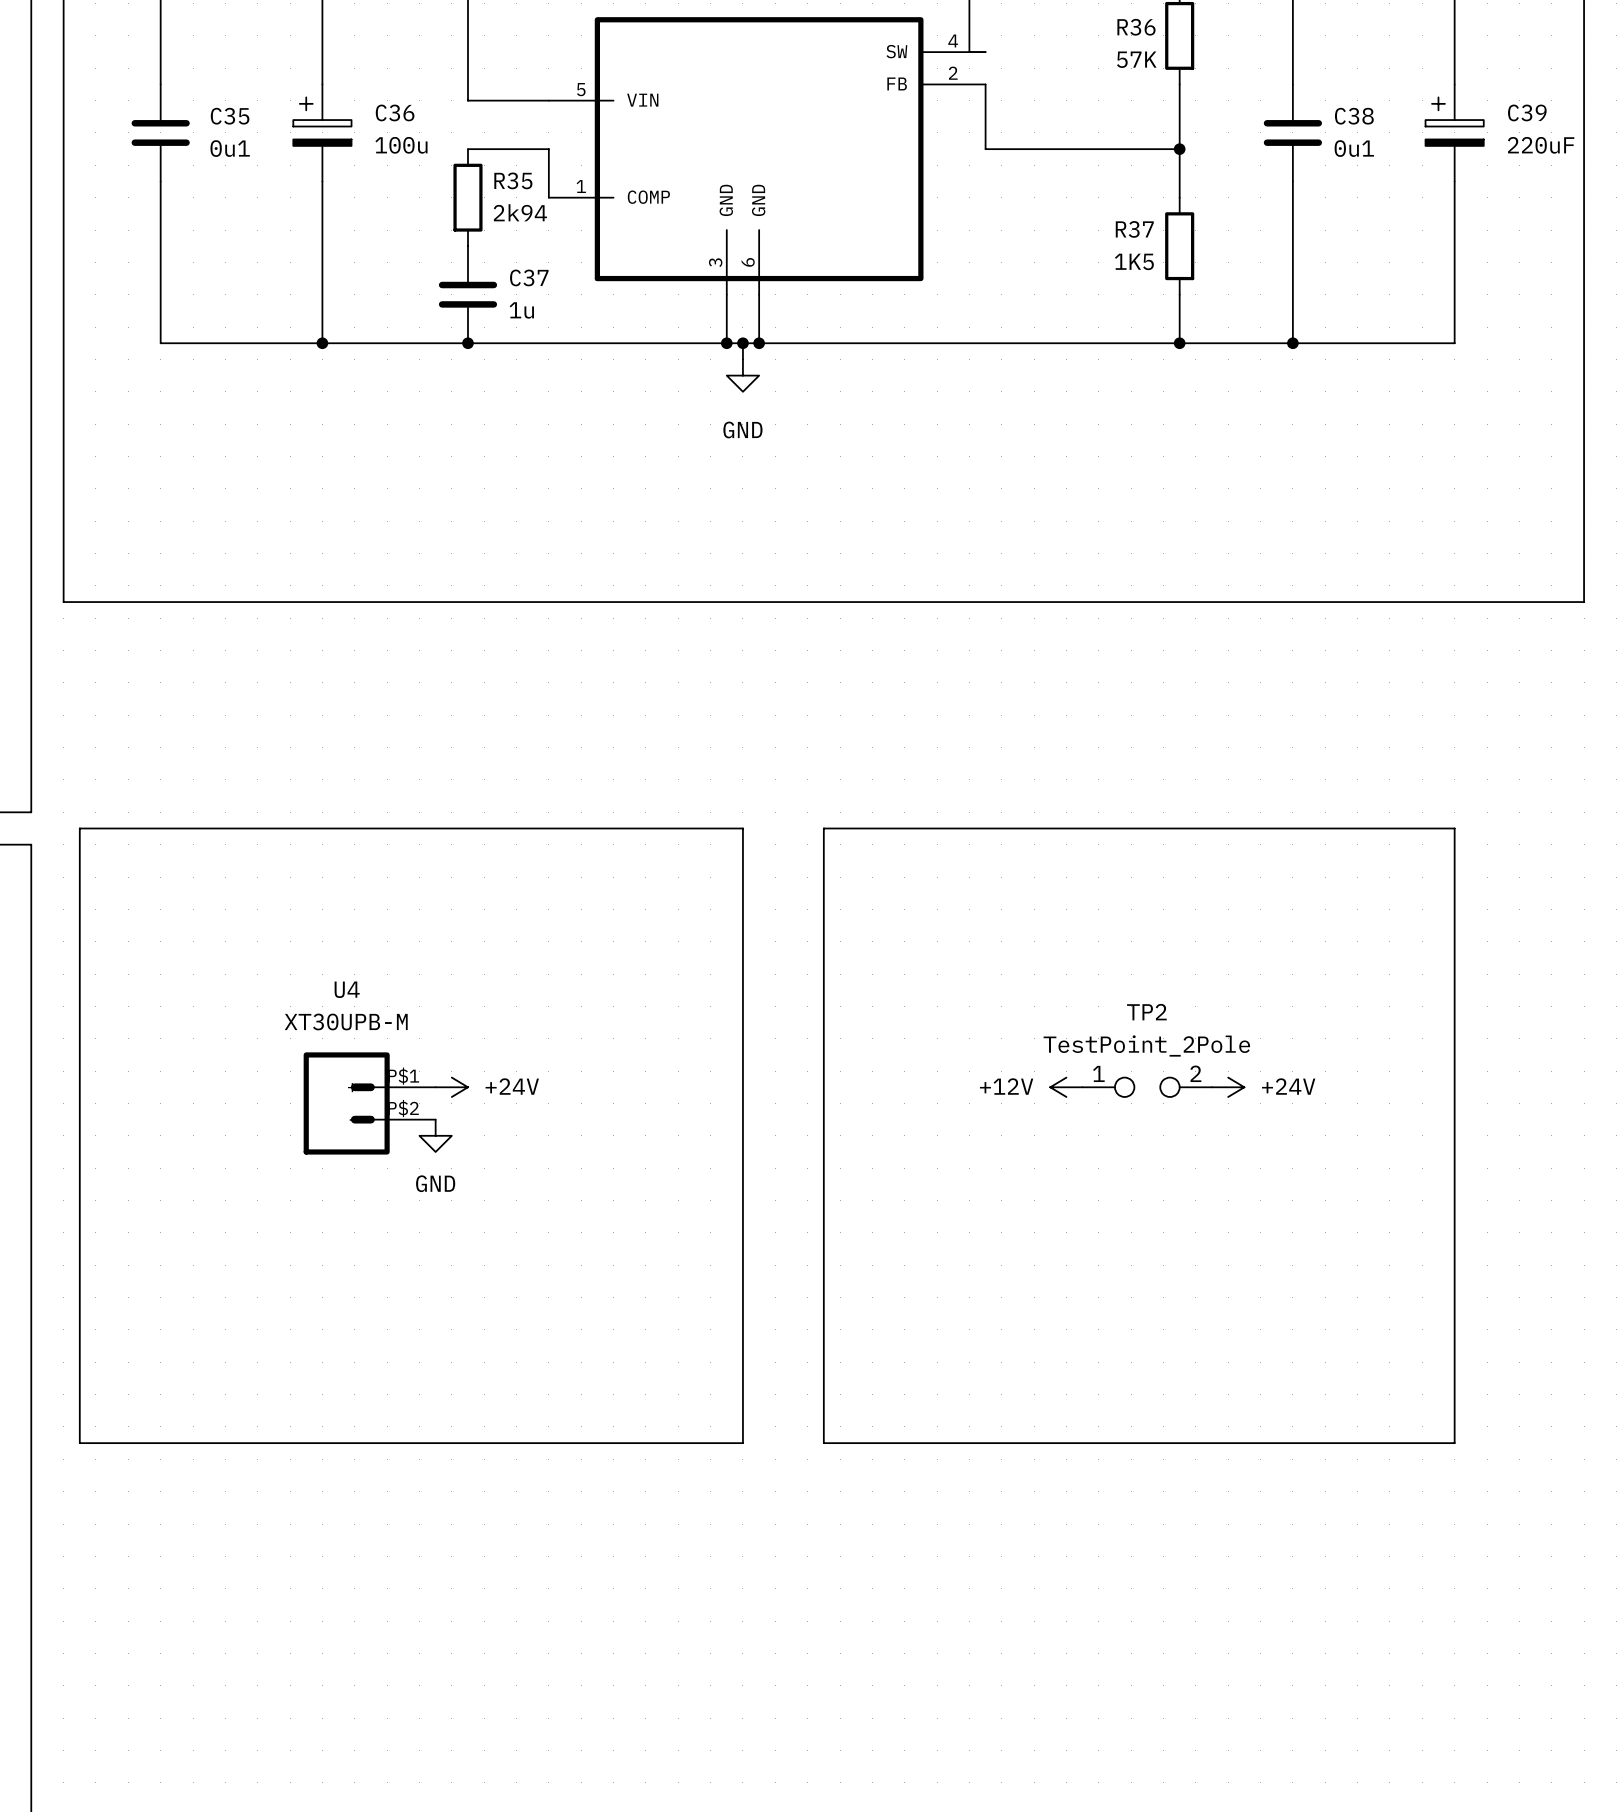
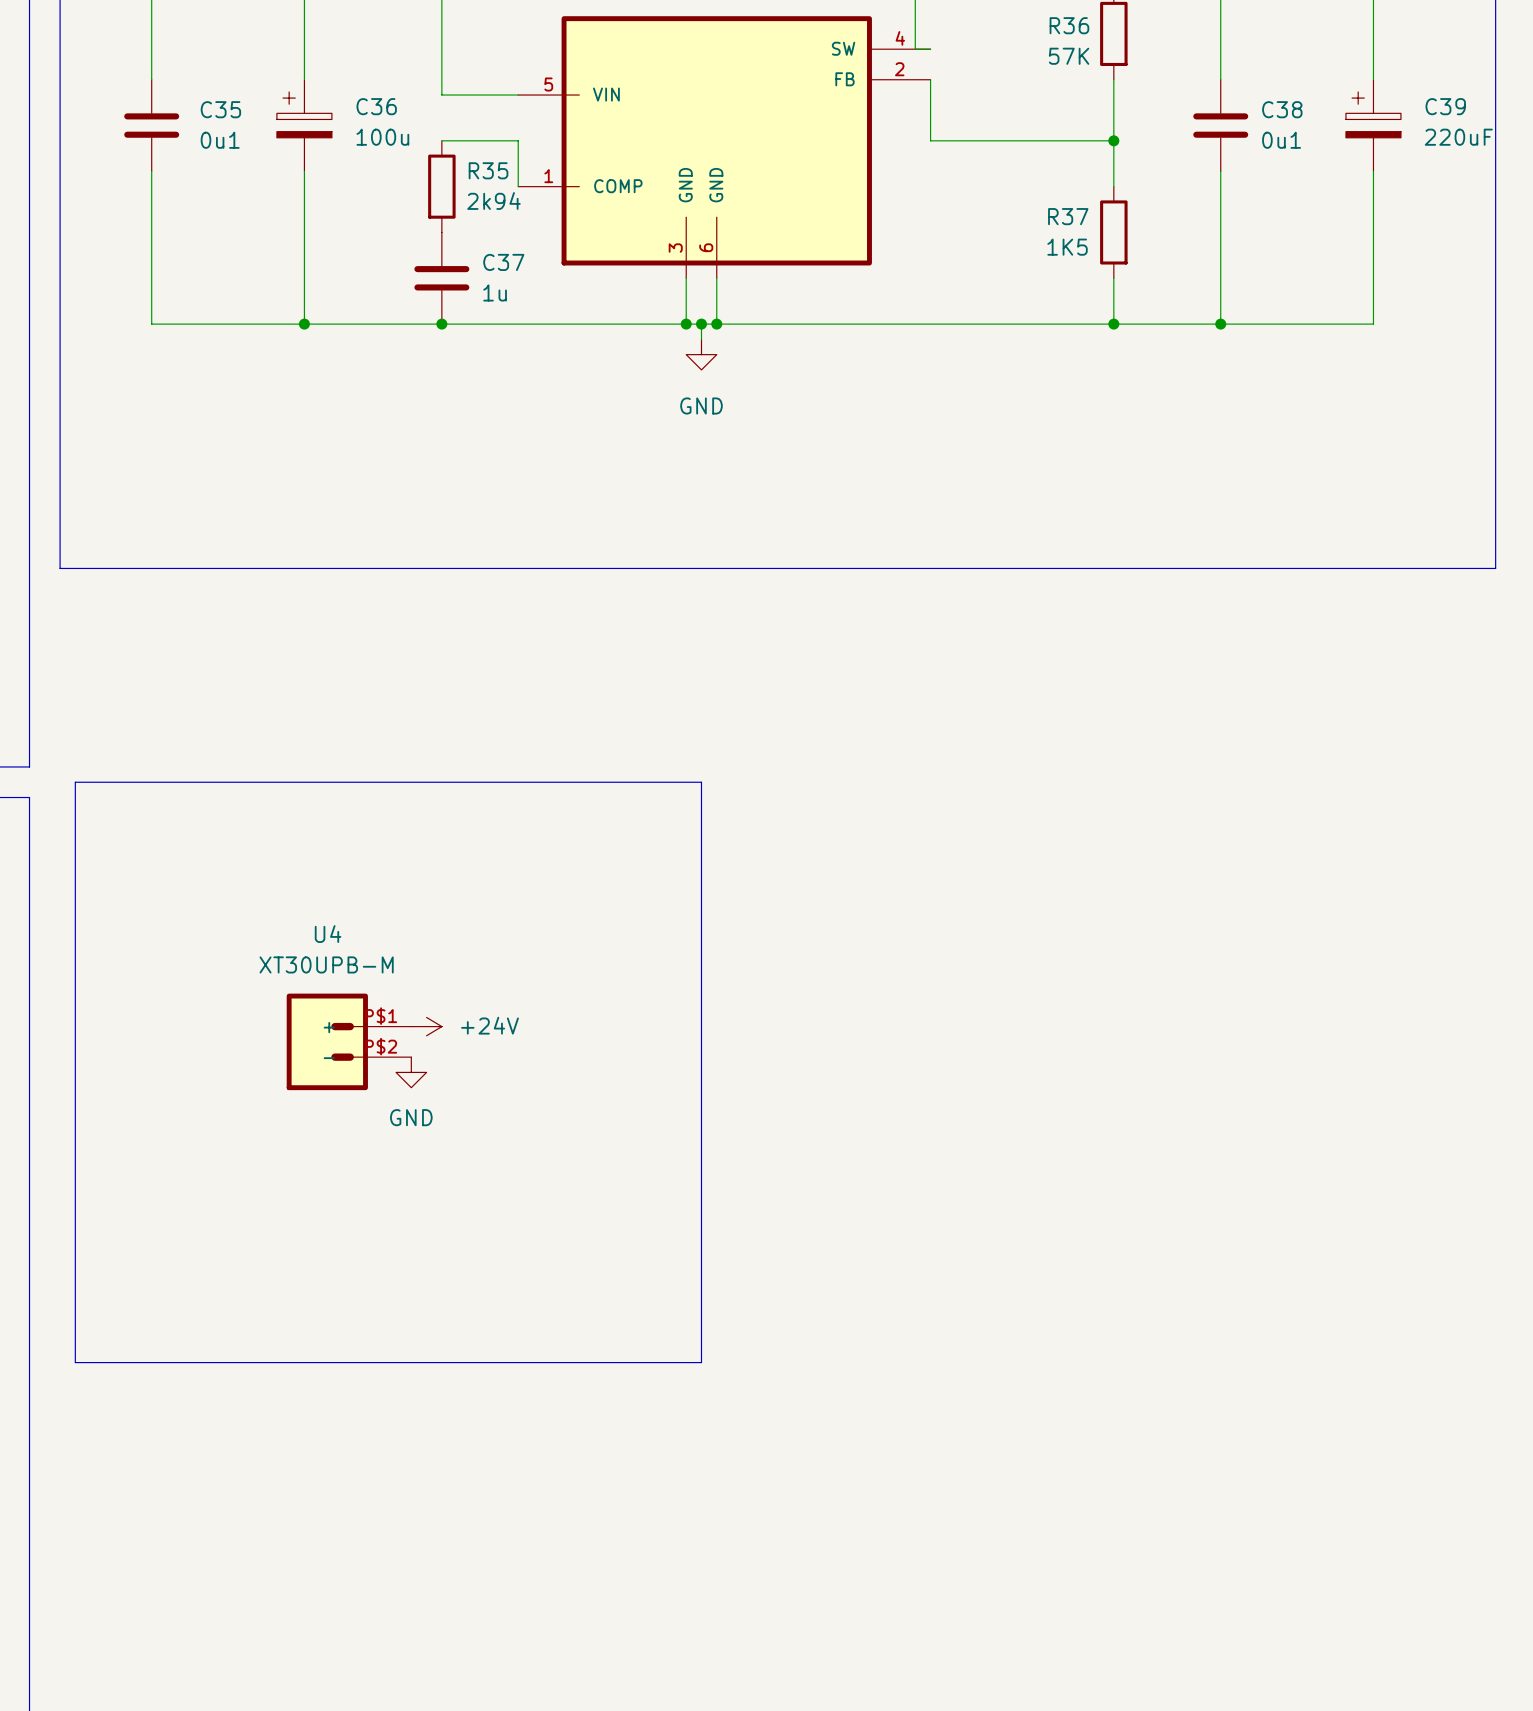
line: (823, 828) (1454, 828) (1454, 1443) (823, 1443) (823, 828) -> none
power symbol: +12V (1066, 1087) -> none
TP2: TestPoint_2Pole (1147, 1087) -> none
power symbol: +24V (1228, 1087) -> none

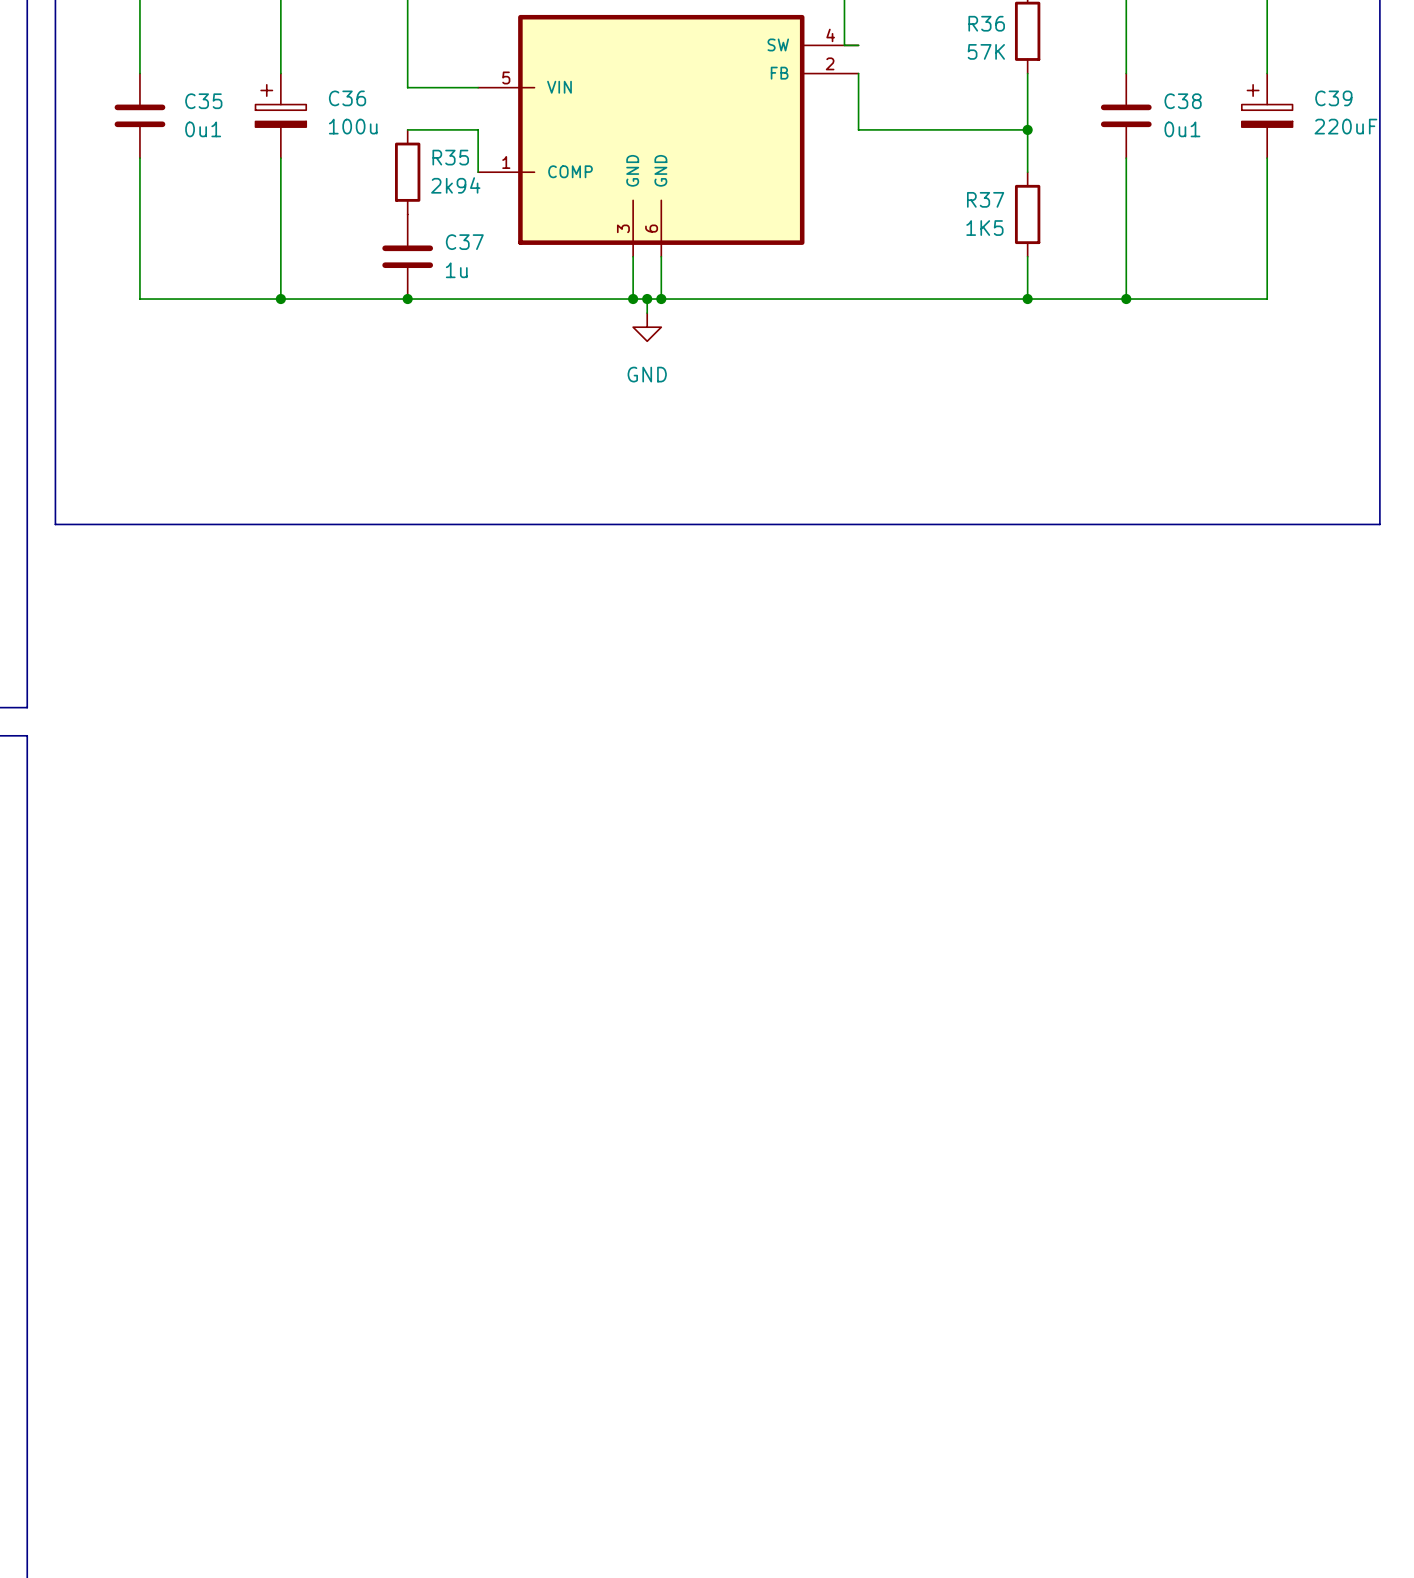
line: (75, 782) (701, 782) (701, 1362) (75, 1362) (75, 782) -> none
power symbol: +24V (426, 1026) -> none
U4: XT30UPB-M (349, 1041) -> none
power symbol: GND (411, 1072) -> none

